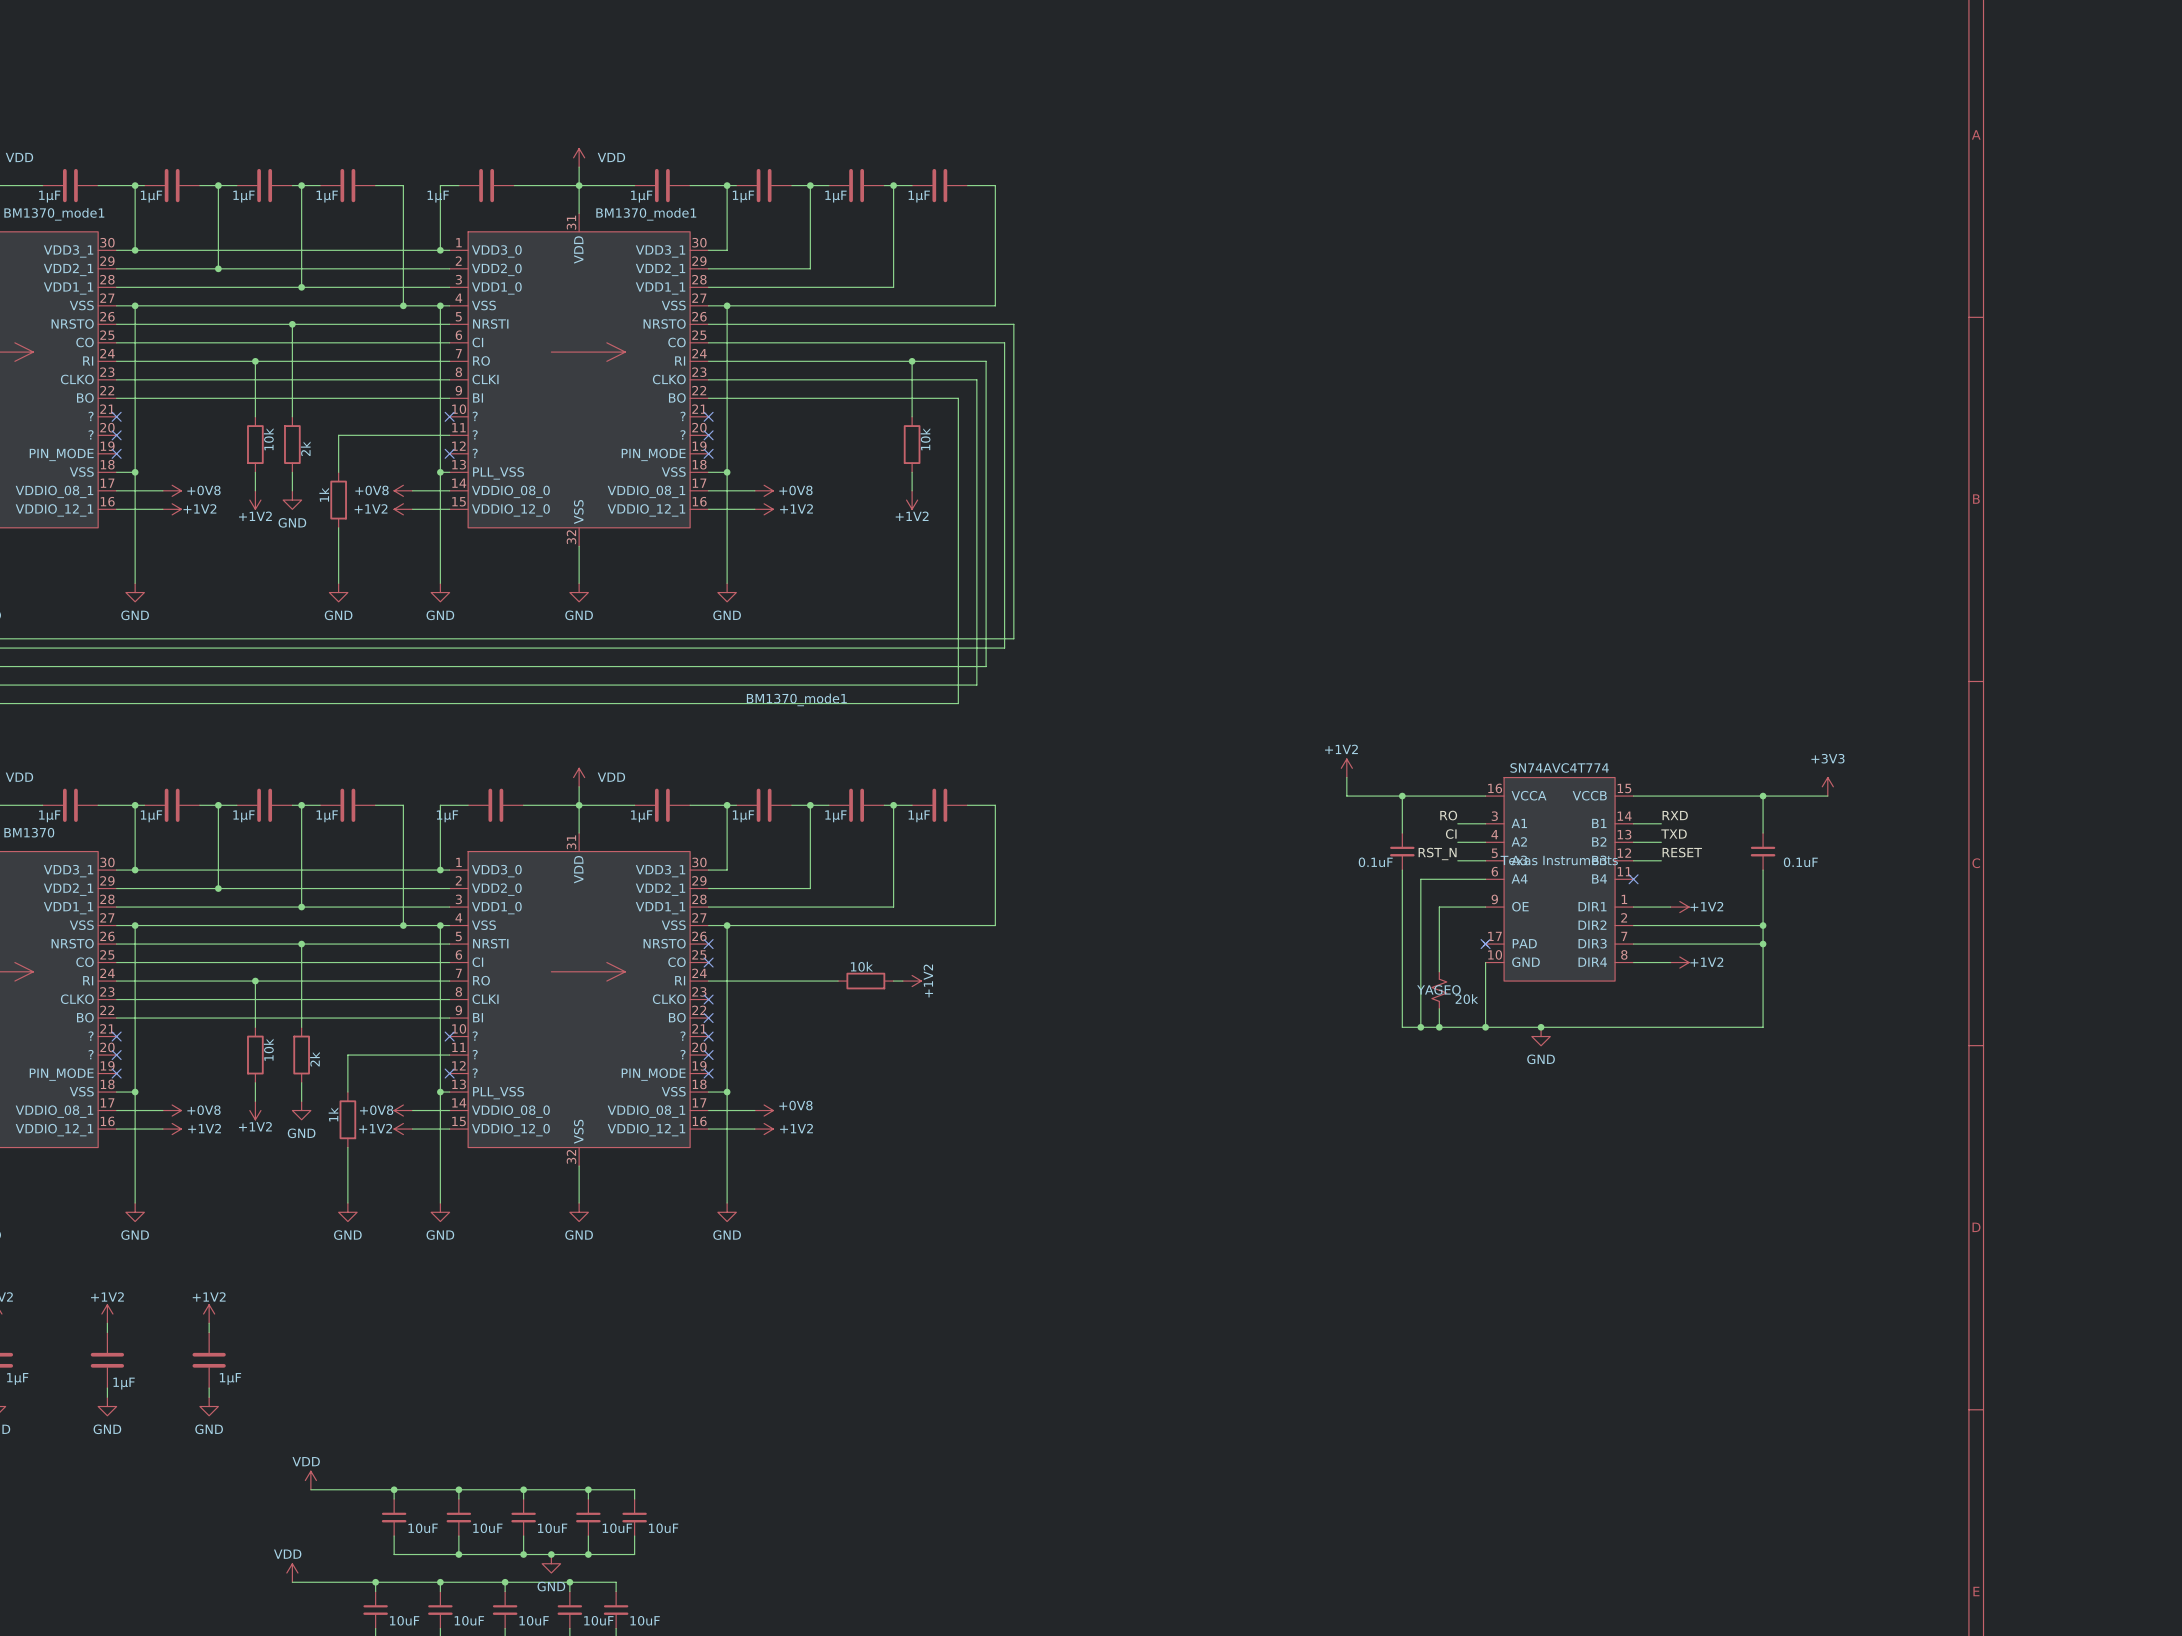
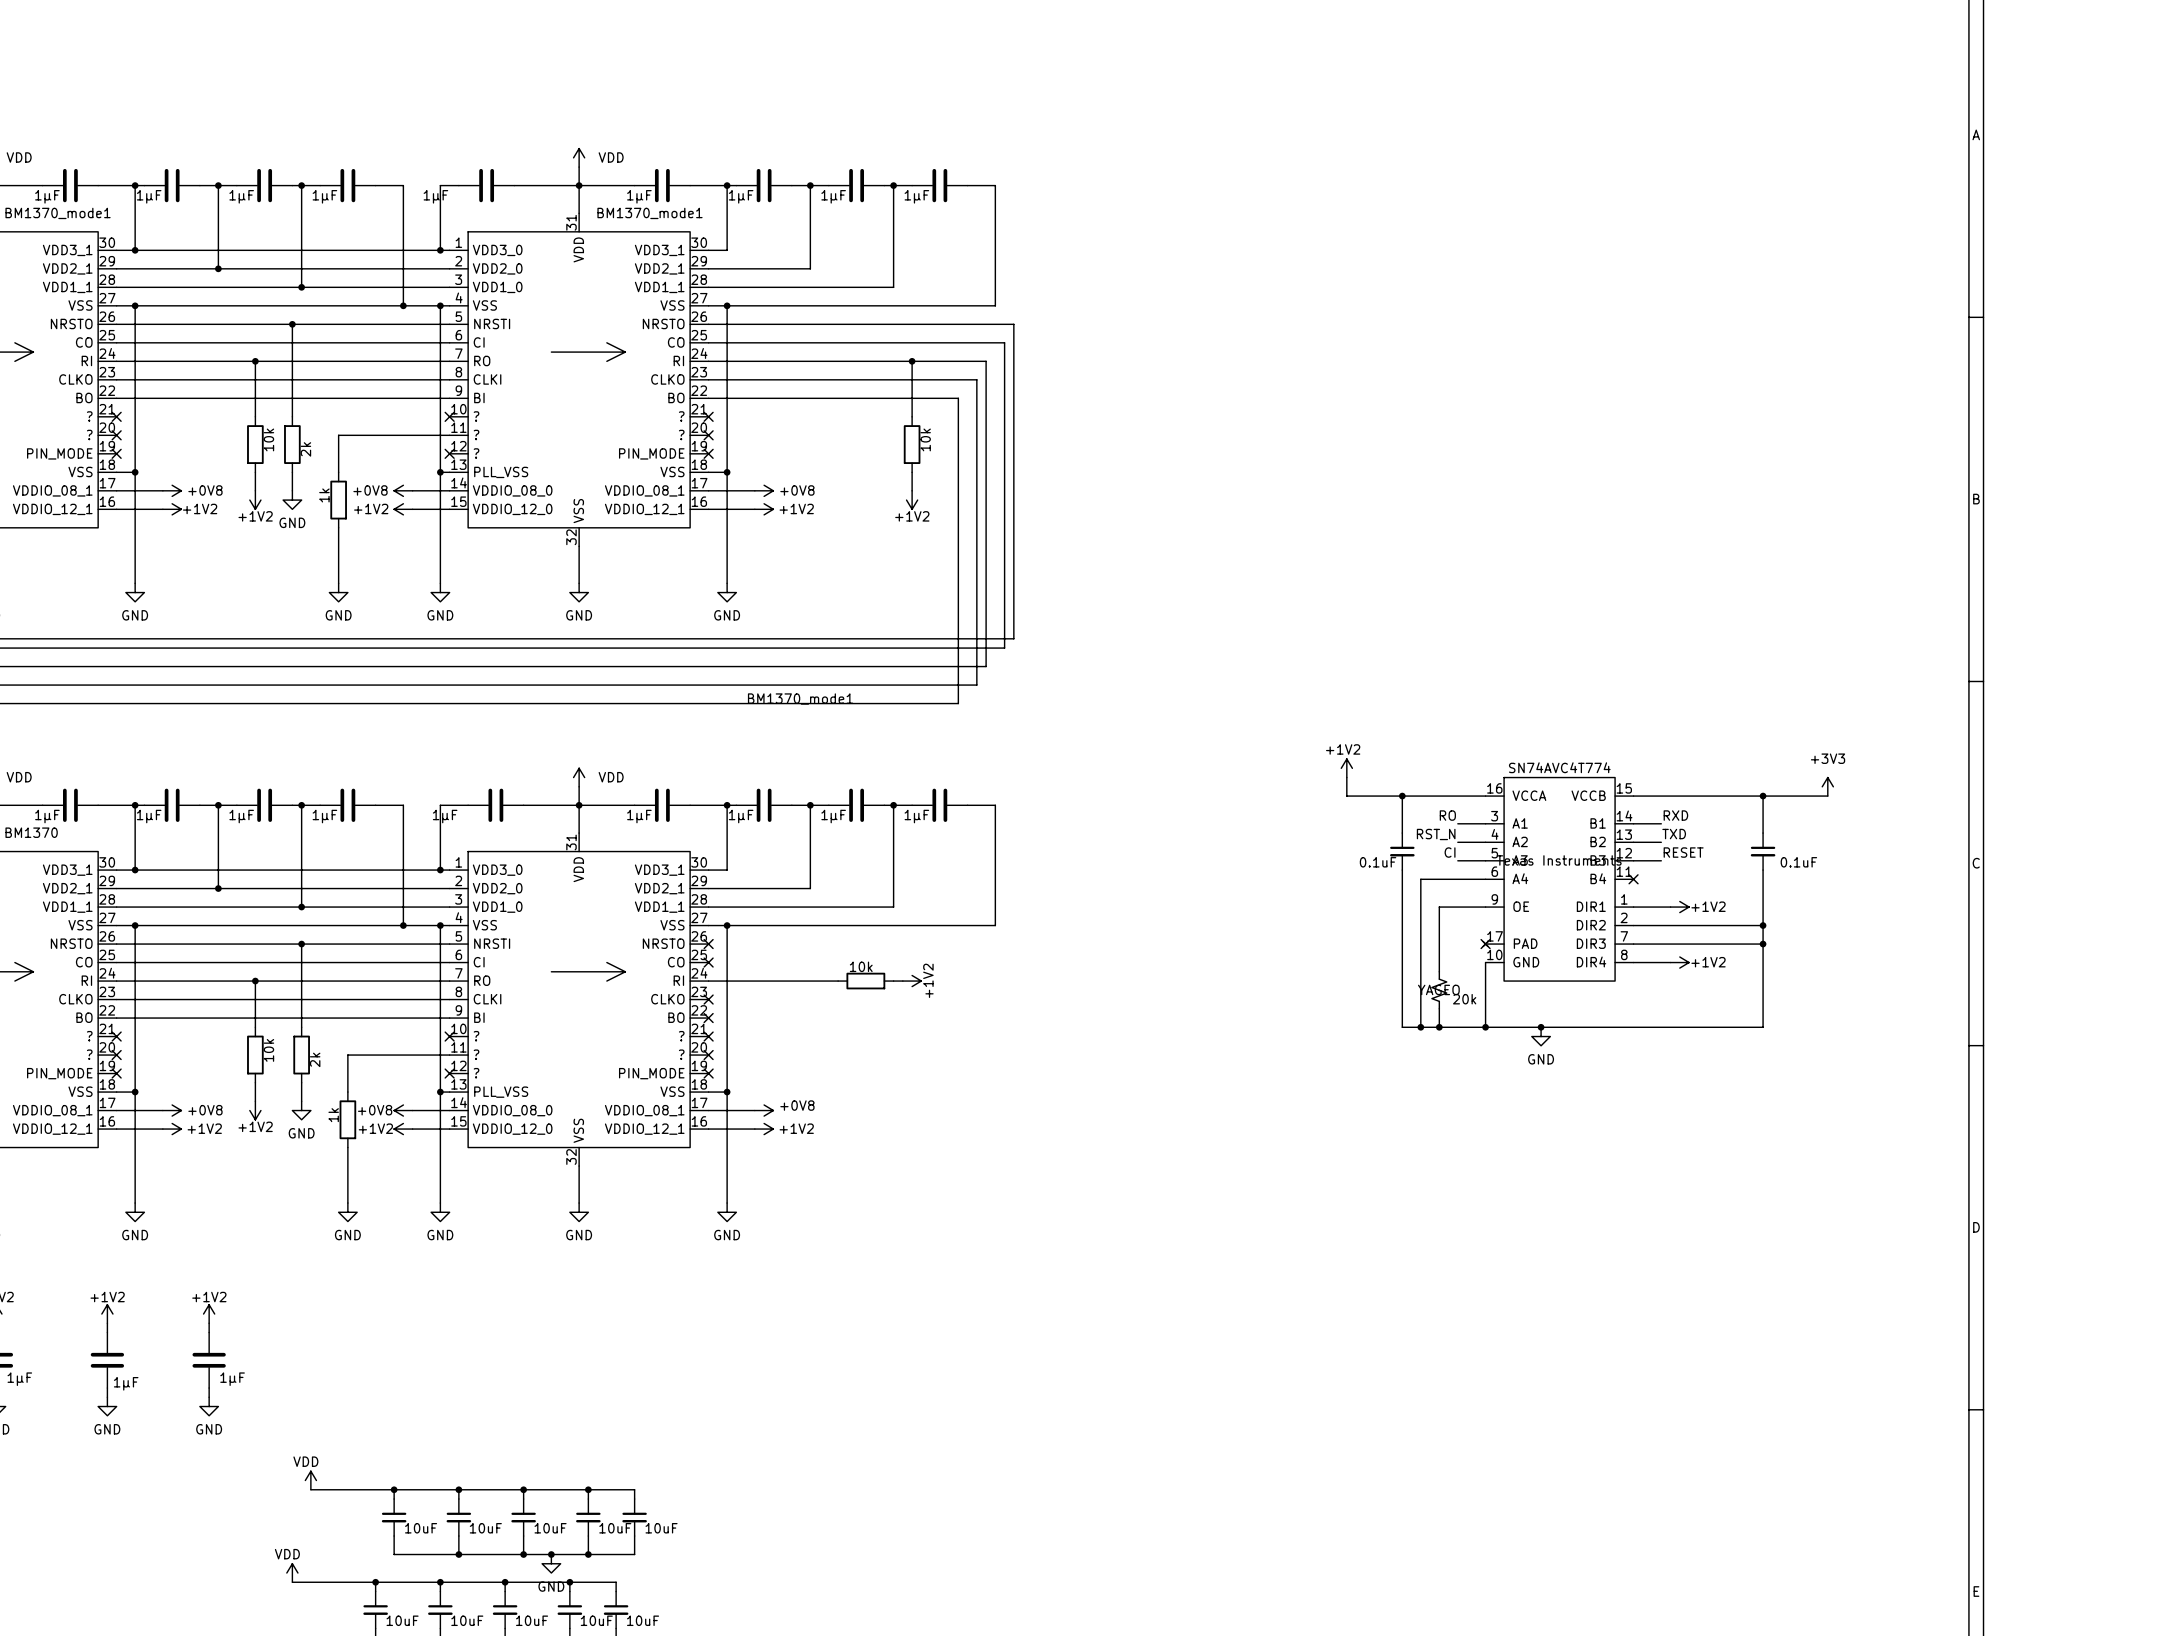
label: CI (1451, 834) -> RST_N (1436, 834)
label: RST_N (1437, 853) -> CI (1450, 852)

